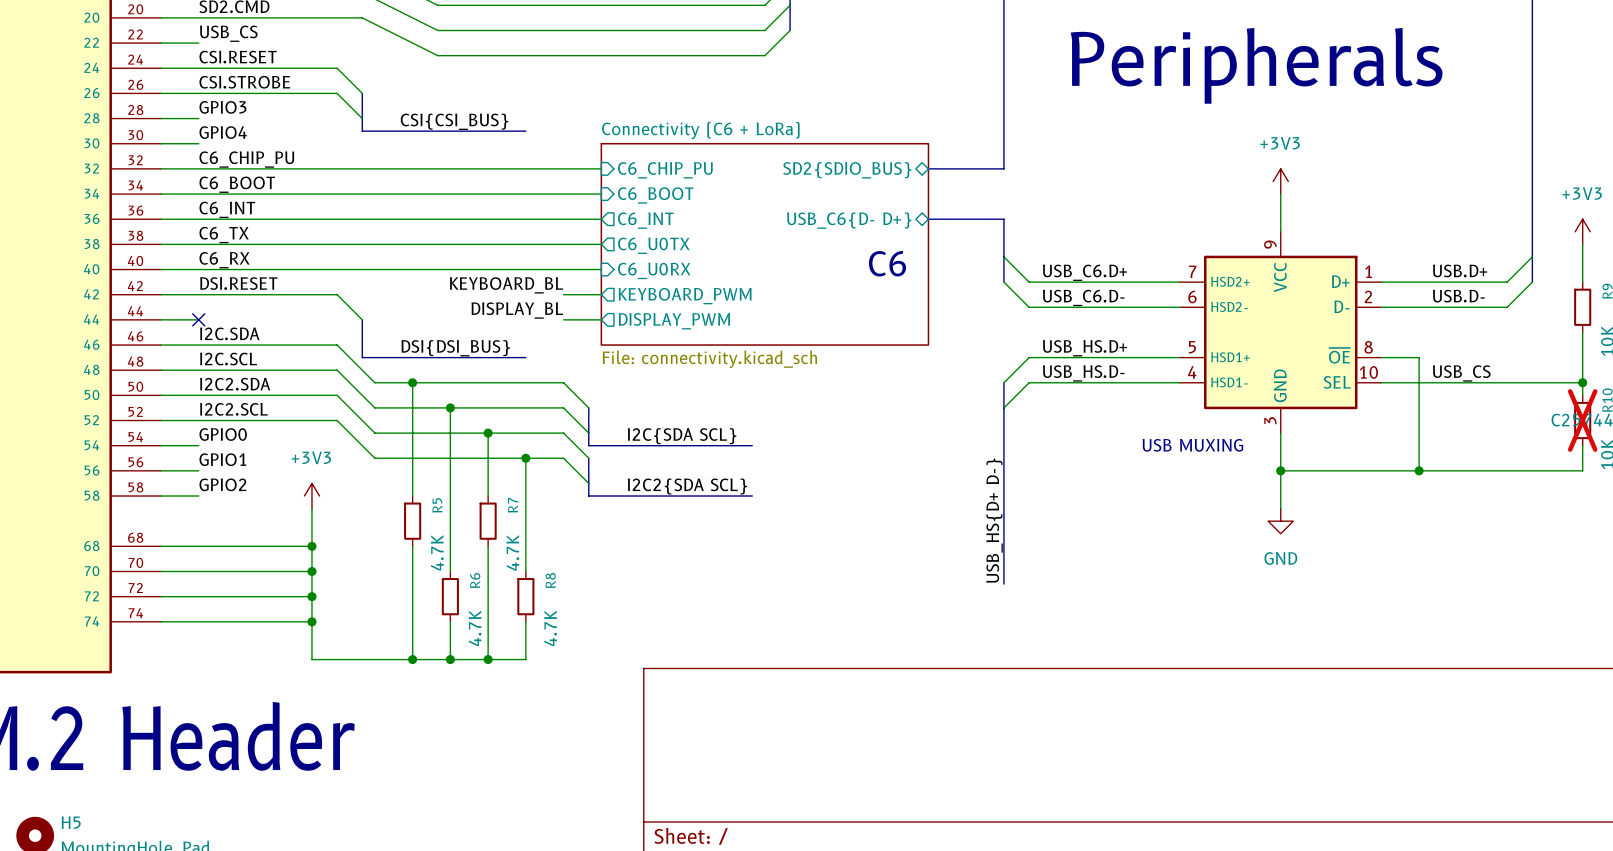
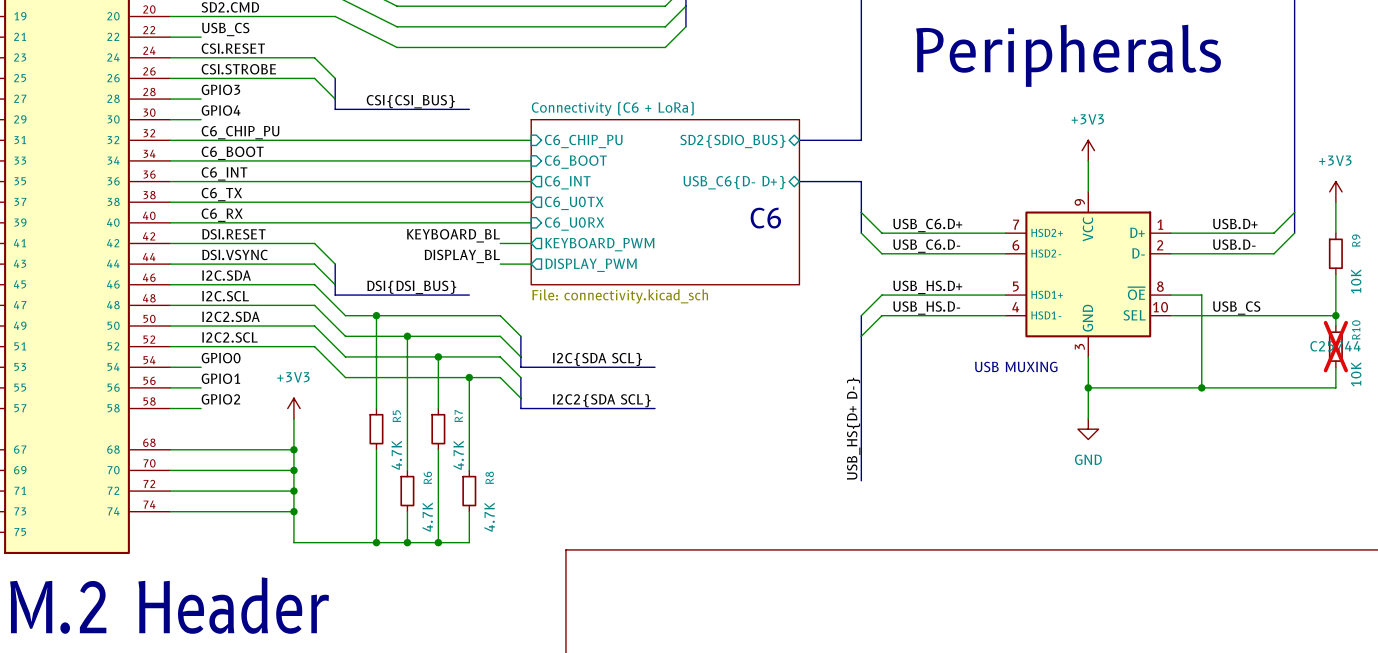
label: none -> DSI.VSYNC (235, 254)
wire: none -> (201, 264) (314, 264) (335, 284)
no-connect mark: (198, 319) -> none

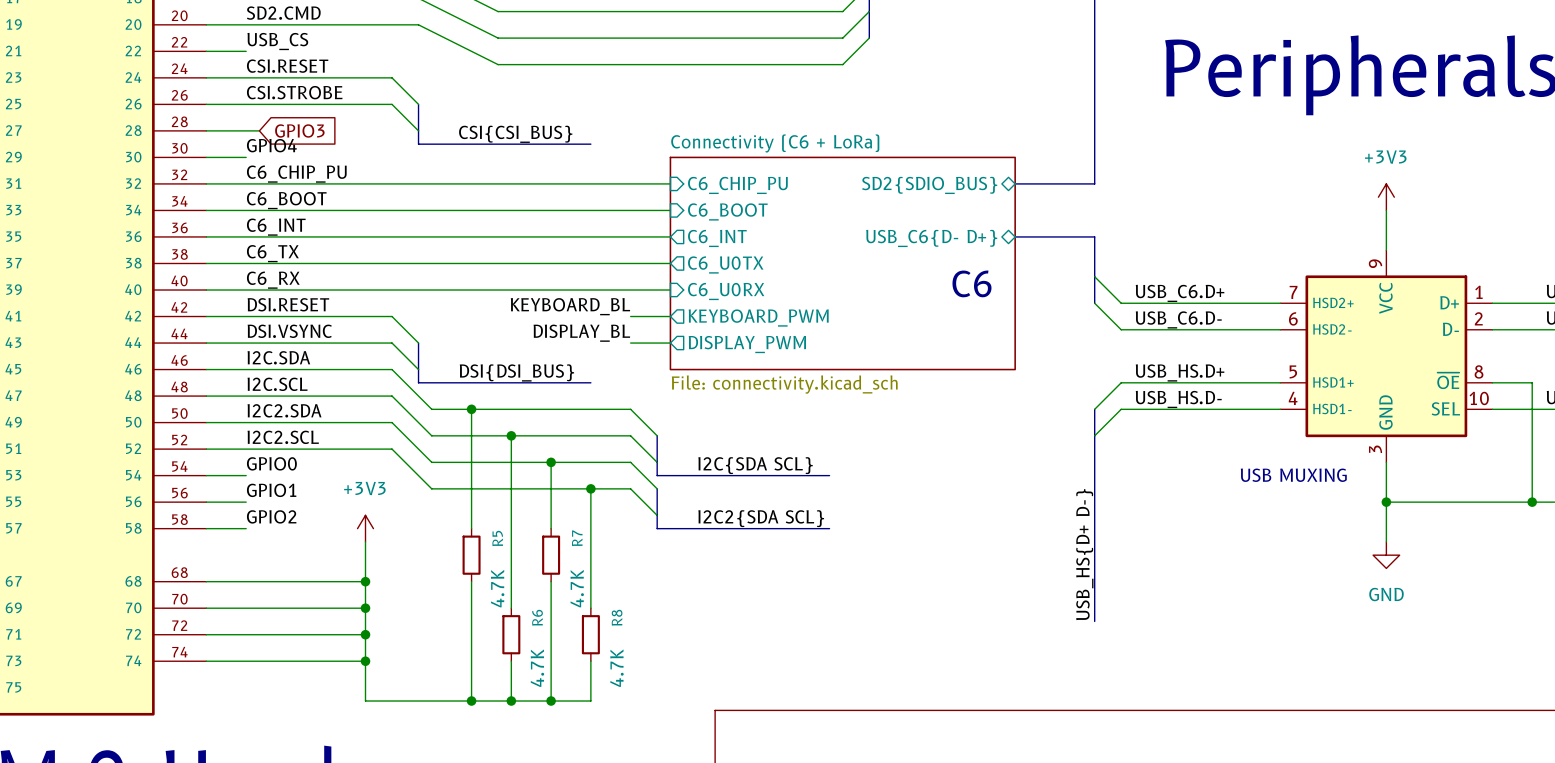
label: GPIO3 (220, 89) -> none
wire: none -> (246, 130) (259, 130)
global label: none -> GPIO3 (299, 130)

